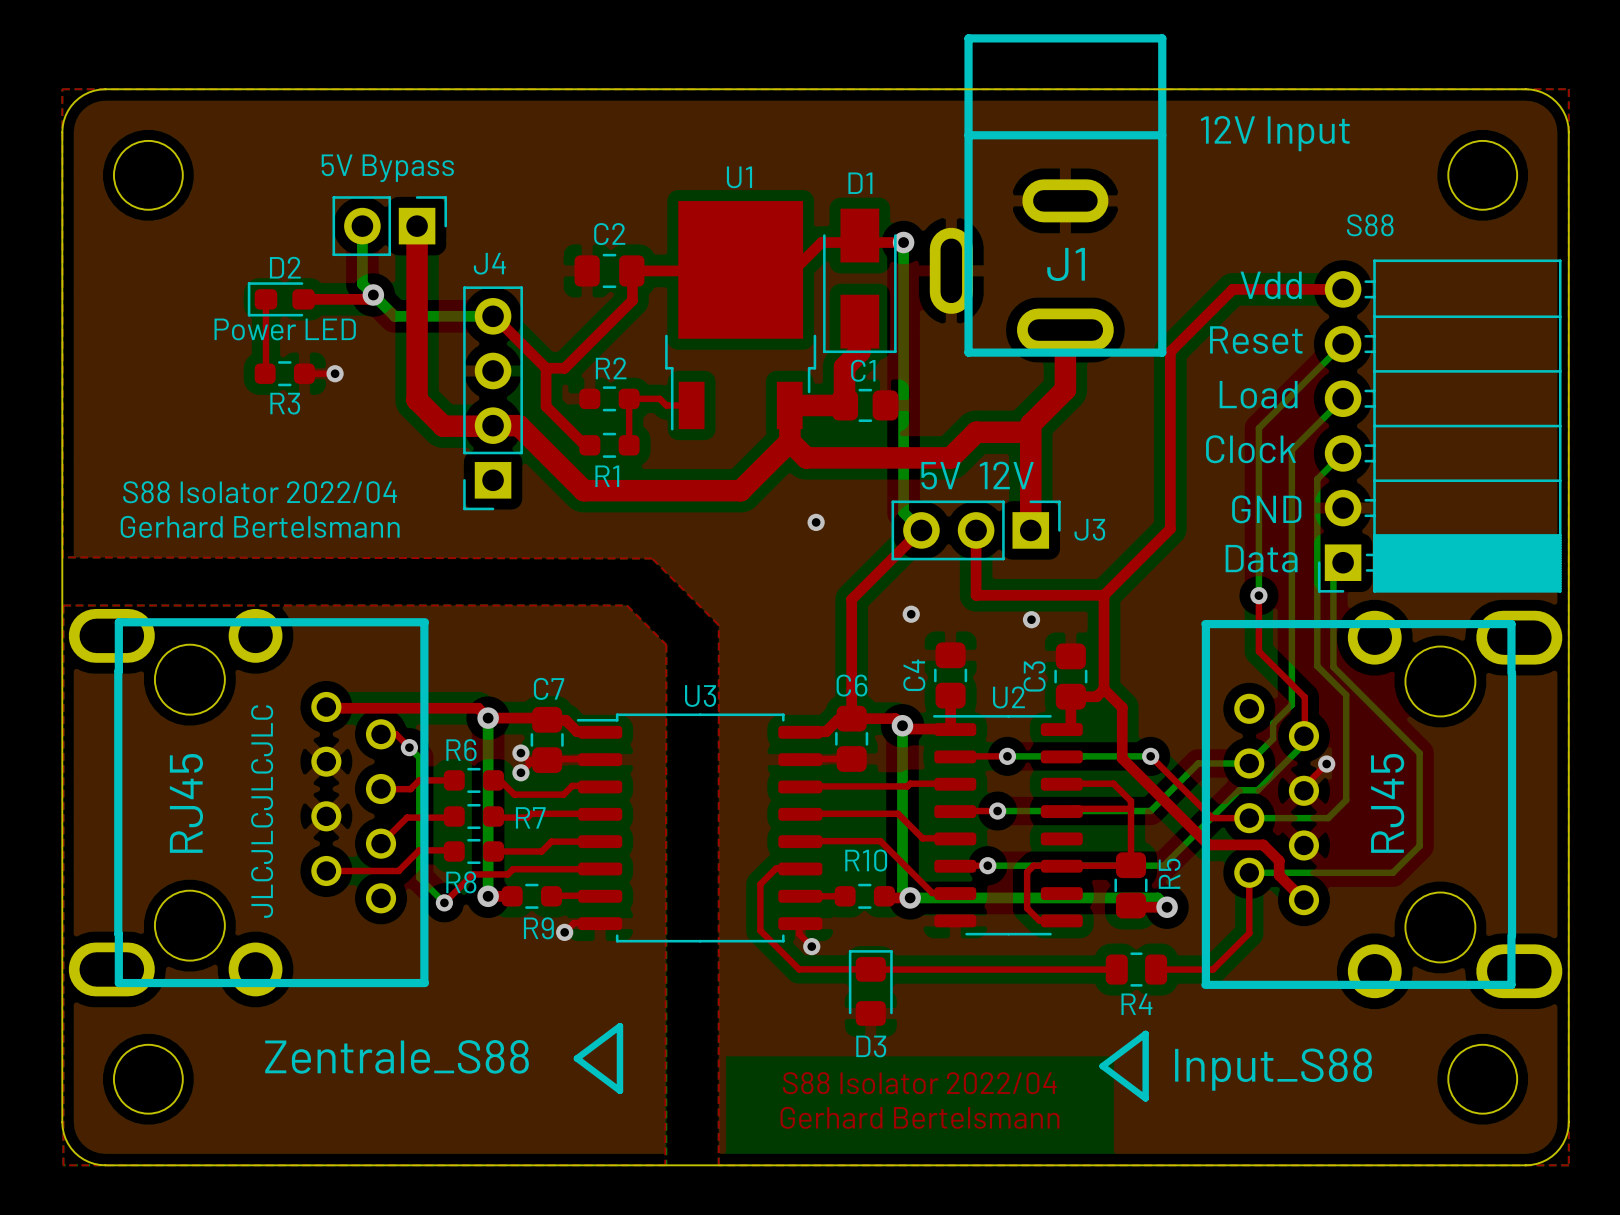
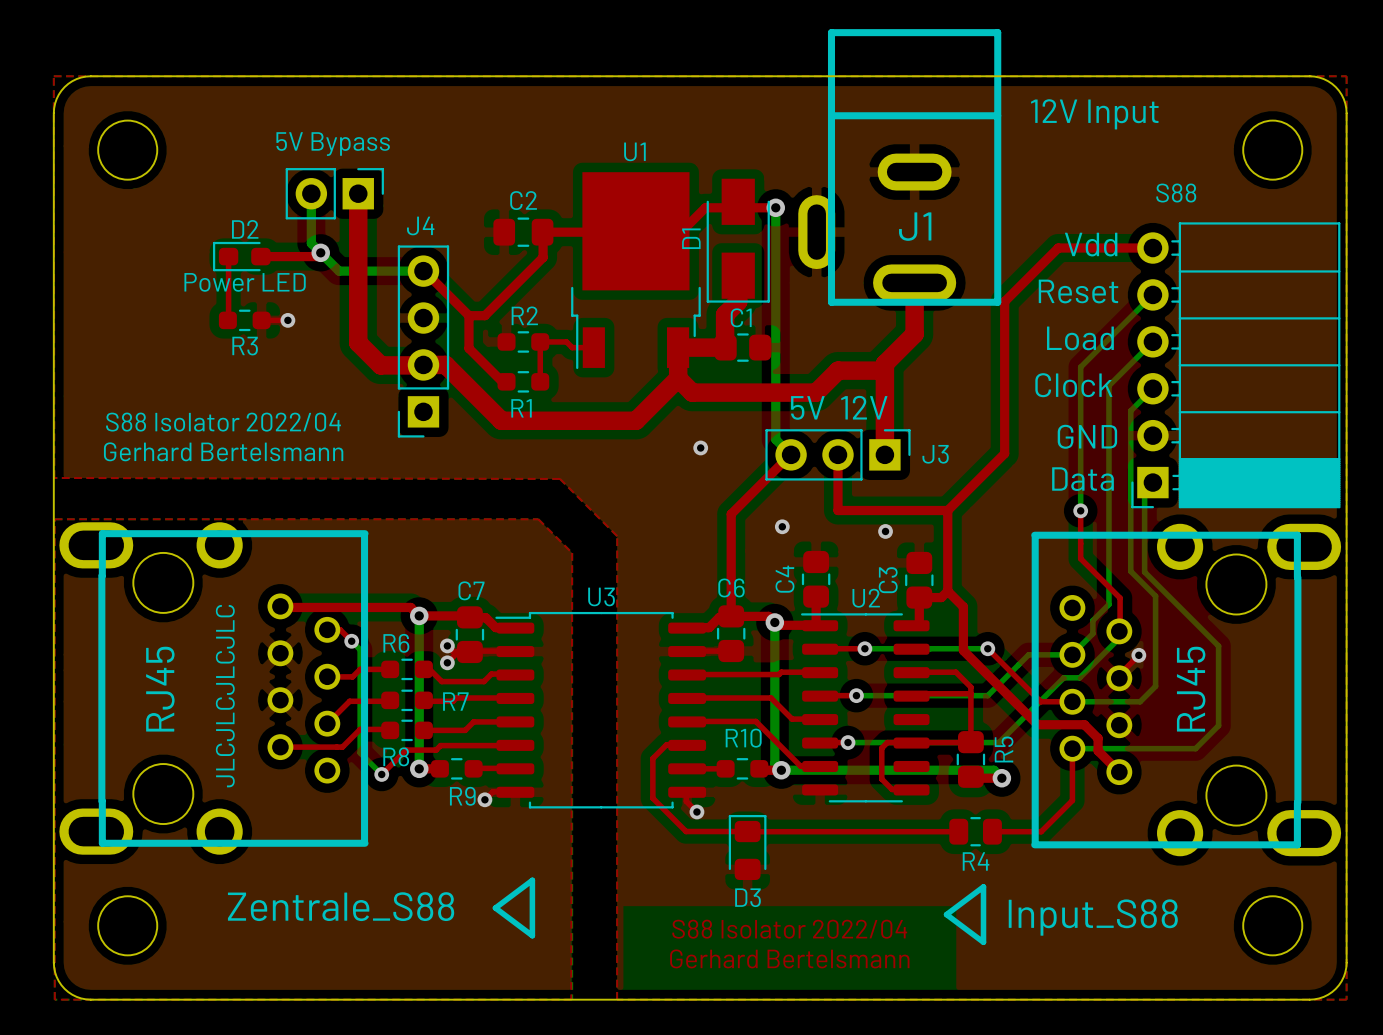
D1 name rotation: 0° (860, 183) -> 90° counterclockwise (691, 238)
D1 name position: D1 (860, 183) -> D1 (691, 238)

